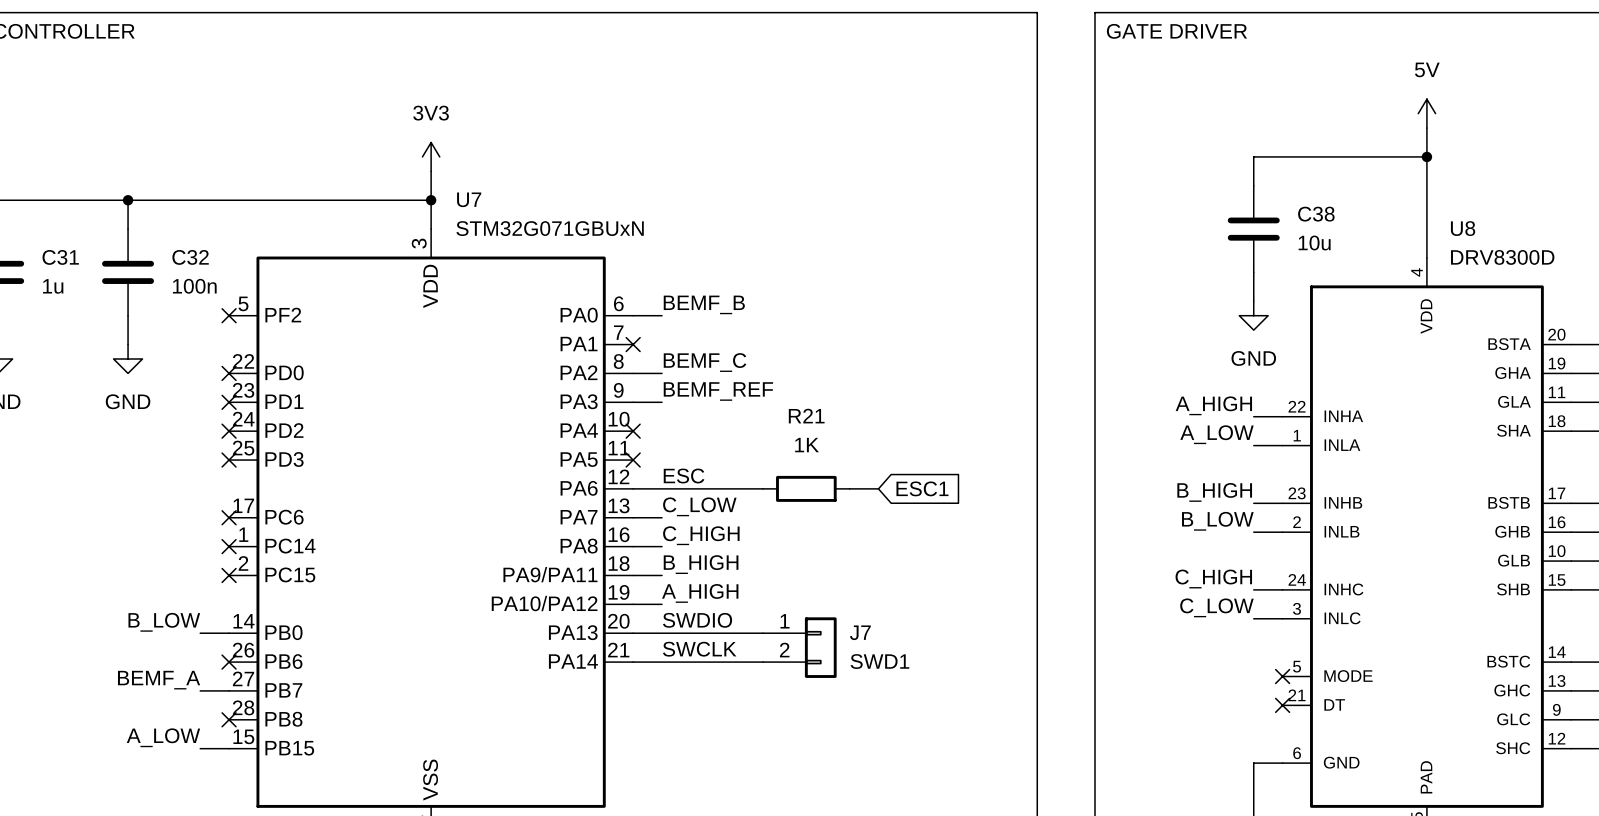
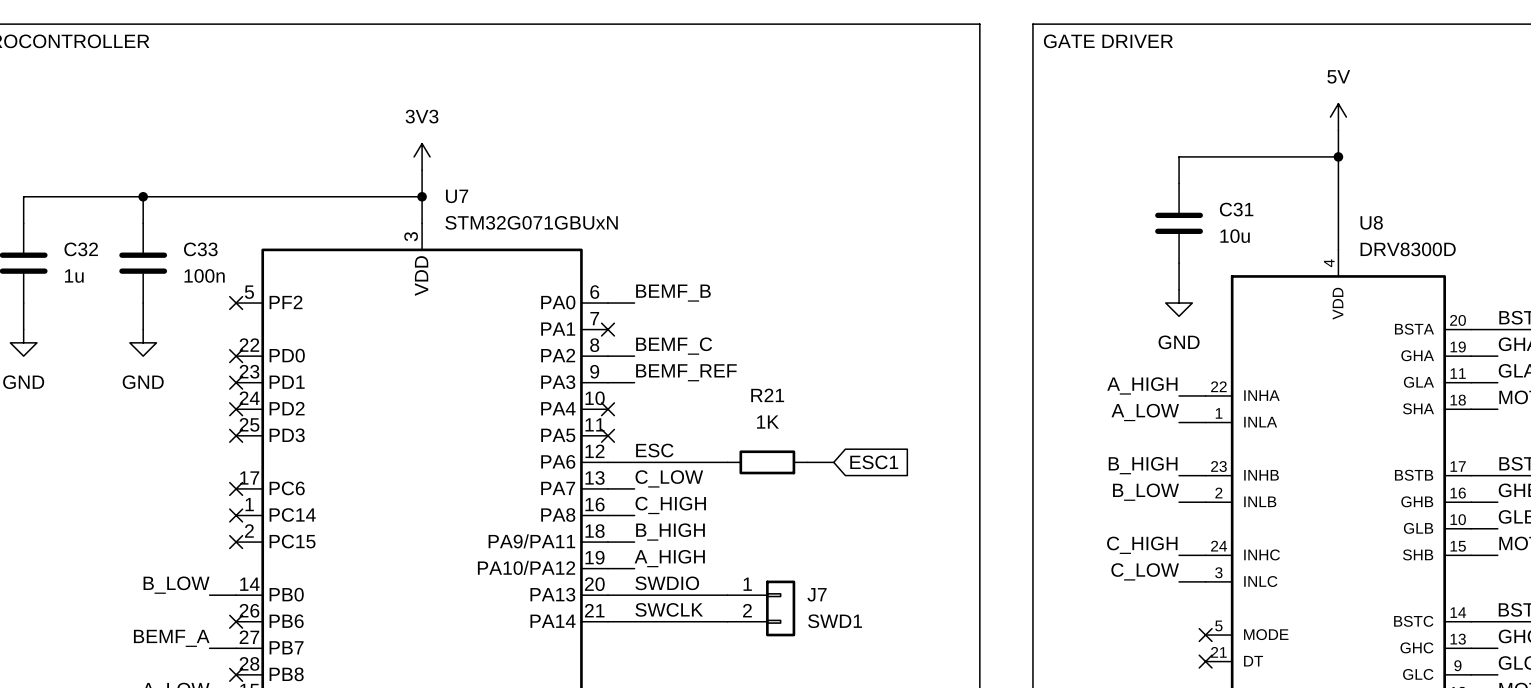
C38 name: C38 (1316, 214) -> C31 (1236, 209)
C31 name: C31 (60, 257) -> C32 (81, 249)
C32 name: C32 (190, 257) -> C33 (200, 249)

